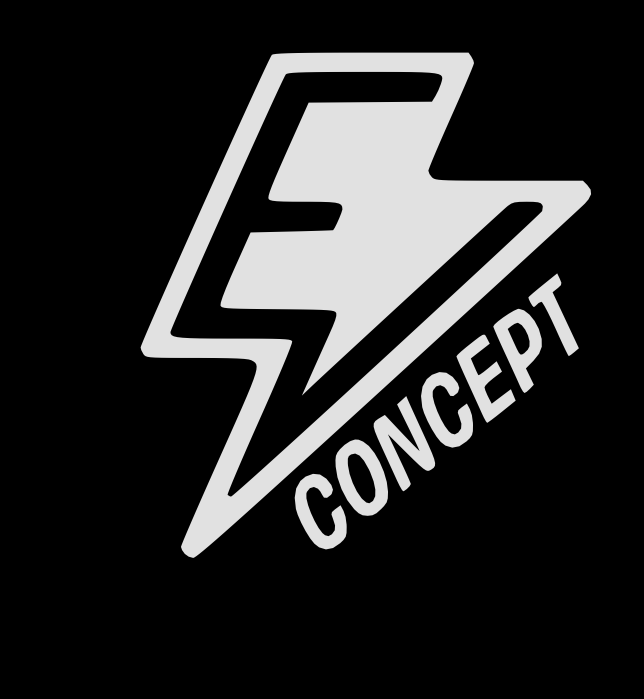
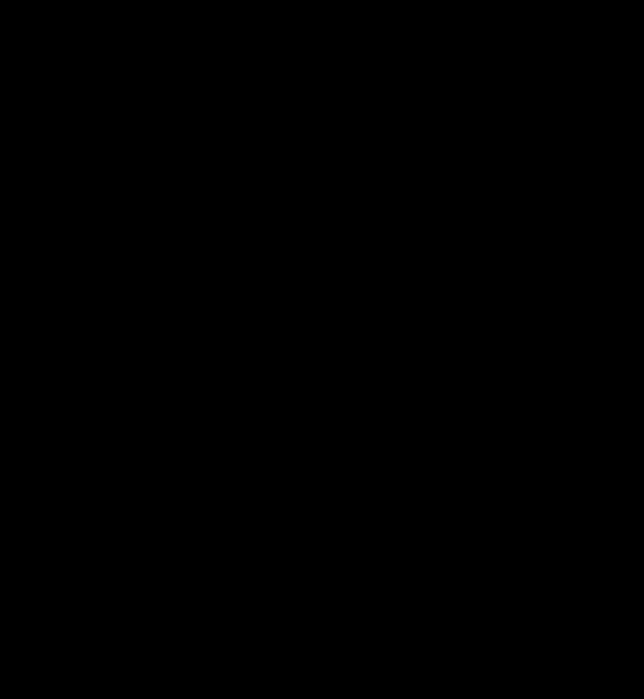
drawing: [140, 52, 592, 558] -> none

